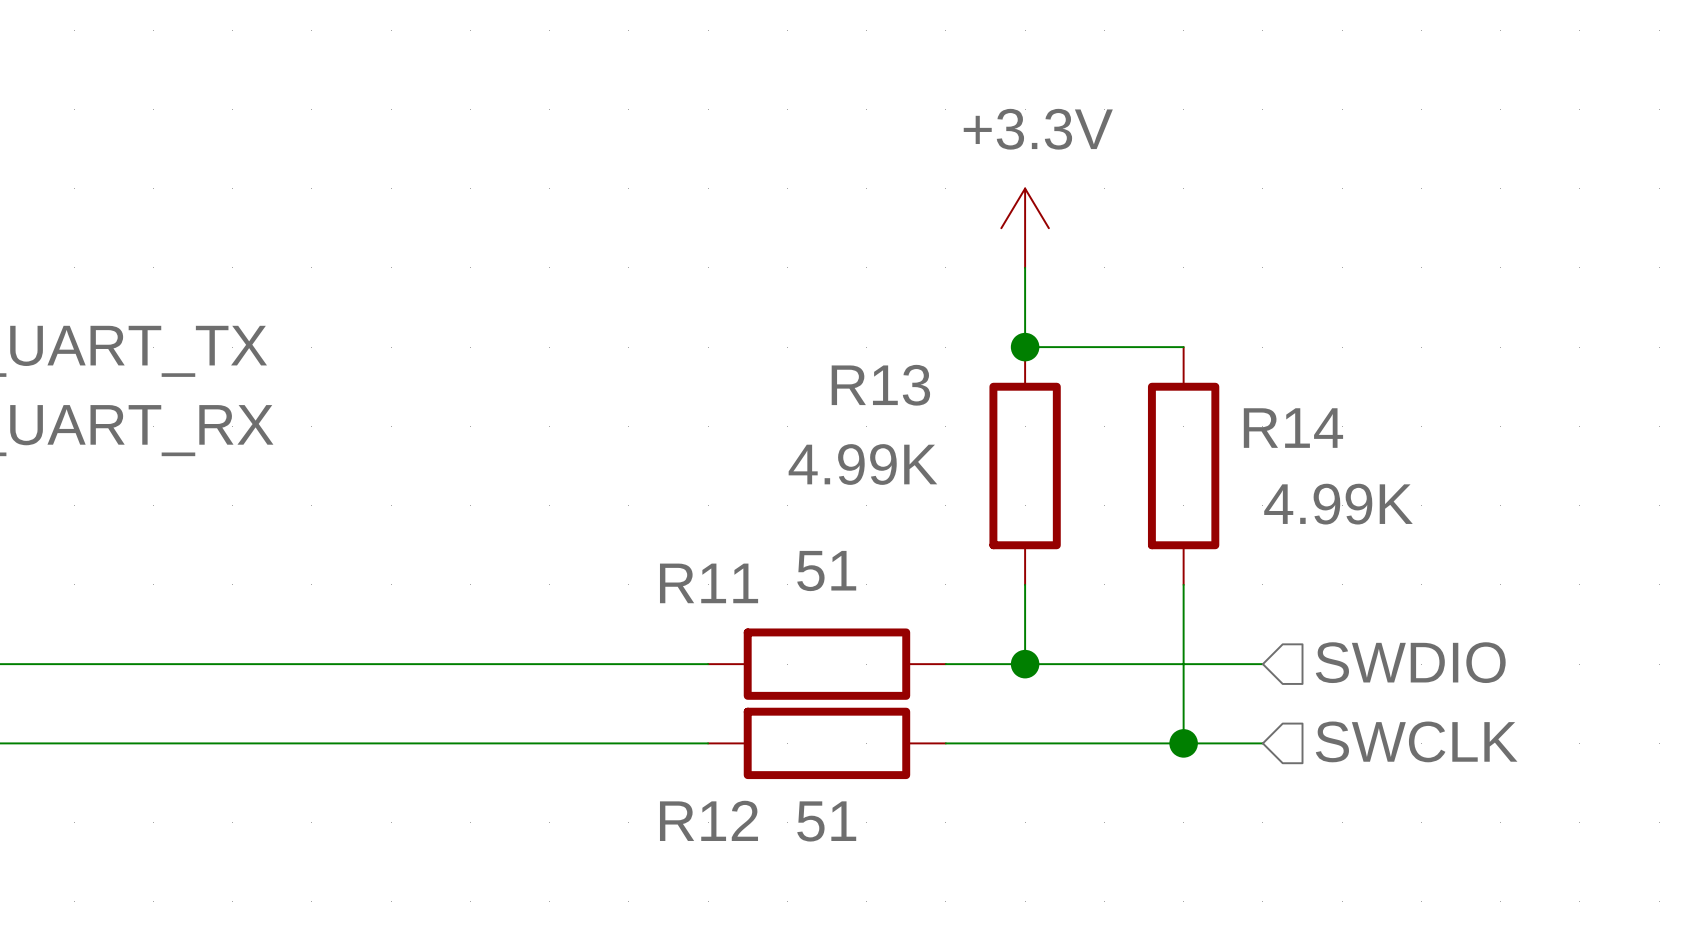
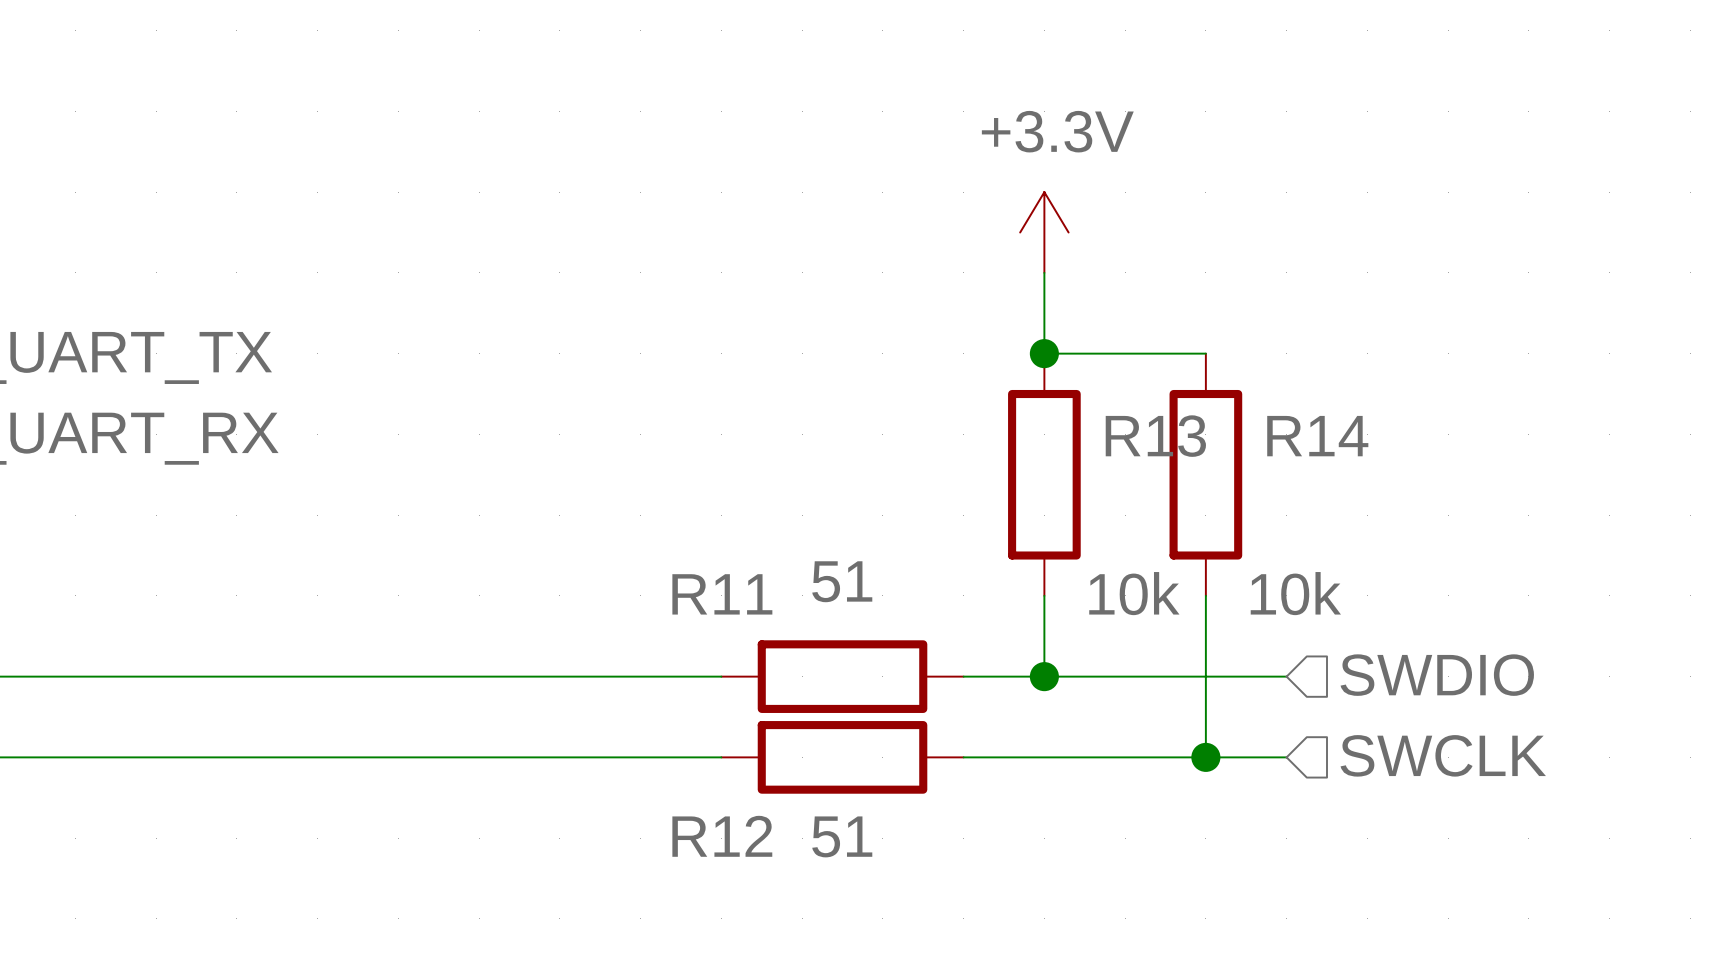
R13 name position: R13 (880, 385) -> R13 (1155, 436)
R13 value: 4.99K (862, 464) -> 10k (1134, 593)
R14 value: 4.99K (1338, 504) -> 10k (1295, 593)

